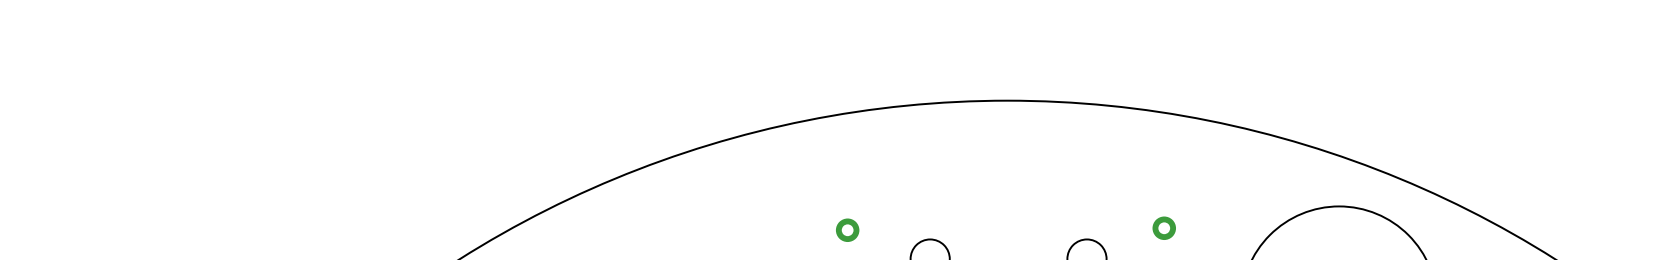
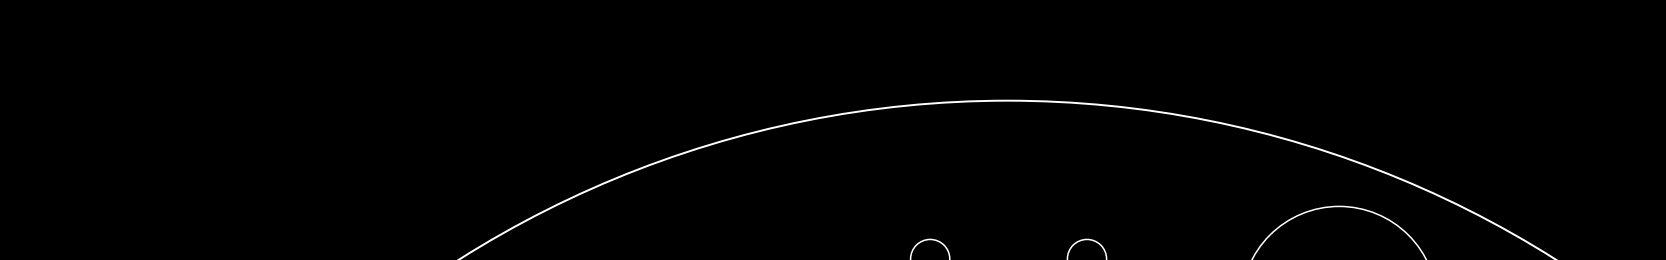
via: (1164, 228) -> none
via: (847, 230) -> none

